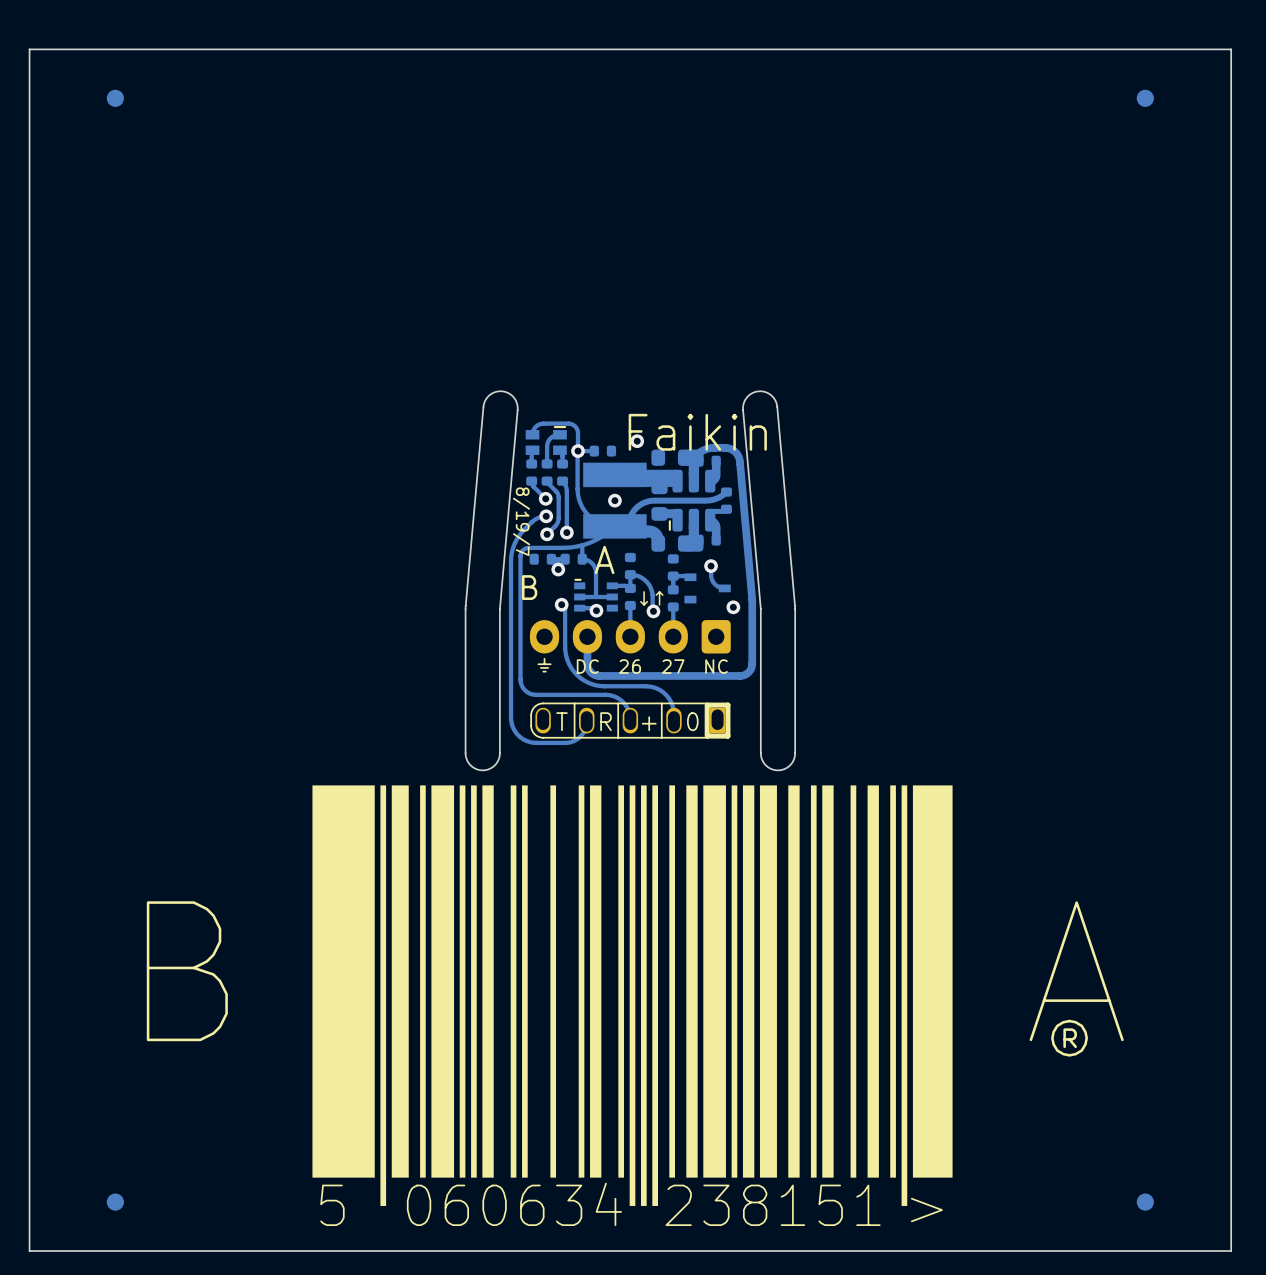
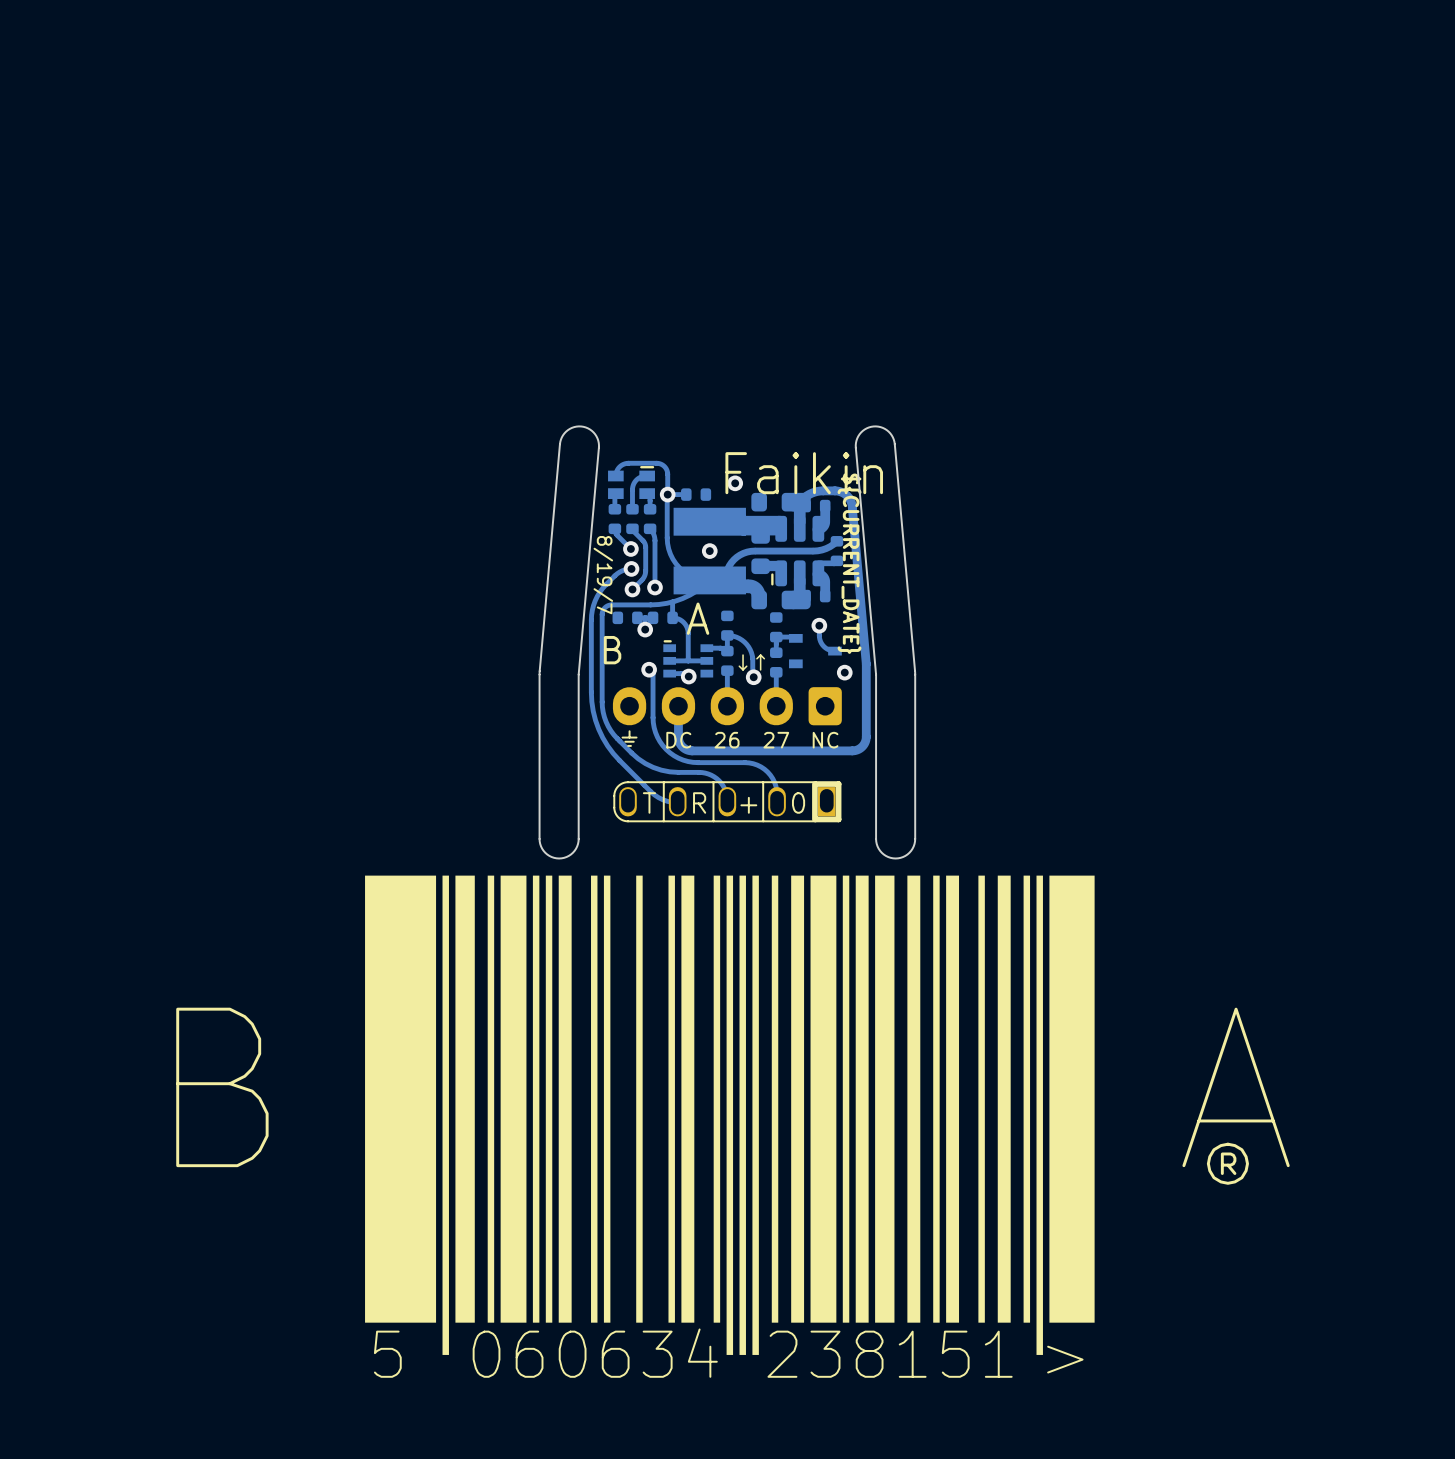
board edge: (1231, 49) (1231, 1251) (29, 1251) (29, 49) (1231, 49) -> none
part: (115, 98) -> none
part: (1145, 98) -> none
text: none -> ${CURRENT_DATE} (849, 563)
track: (511, 624) (511, 717) (516, 733) (523, 739) (532, 742) (568, 742) (580, 736) (585, 729) (586, 721) -> (591, 692) (593, 711) (598, 729) (613, 753) (654, 794) (663, 799) (677, 802)
track: (520, 633) (520, 681) (525, 690) (533, 694) (587, 694) -> (602, 701) (608, 726) (631, 753) (653, 767) (678, 772)
part: (115, 1202) -> none
part: (1145, 1202) -> none

